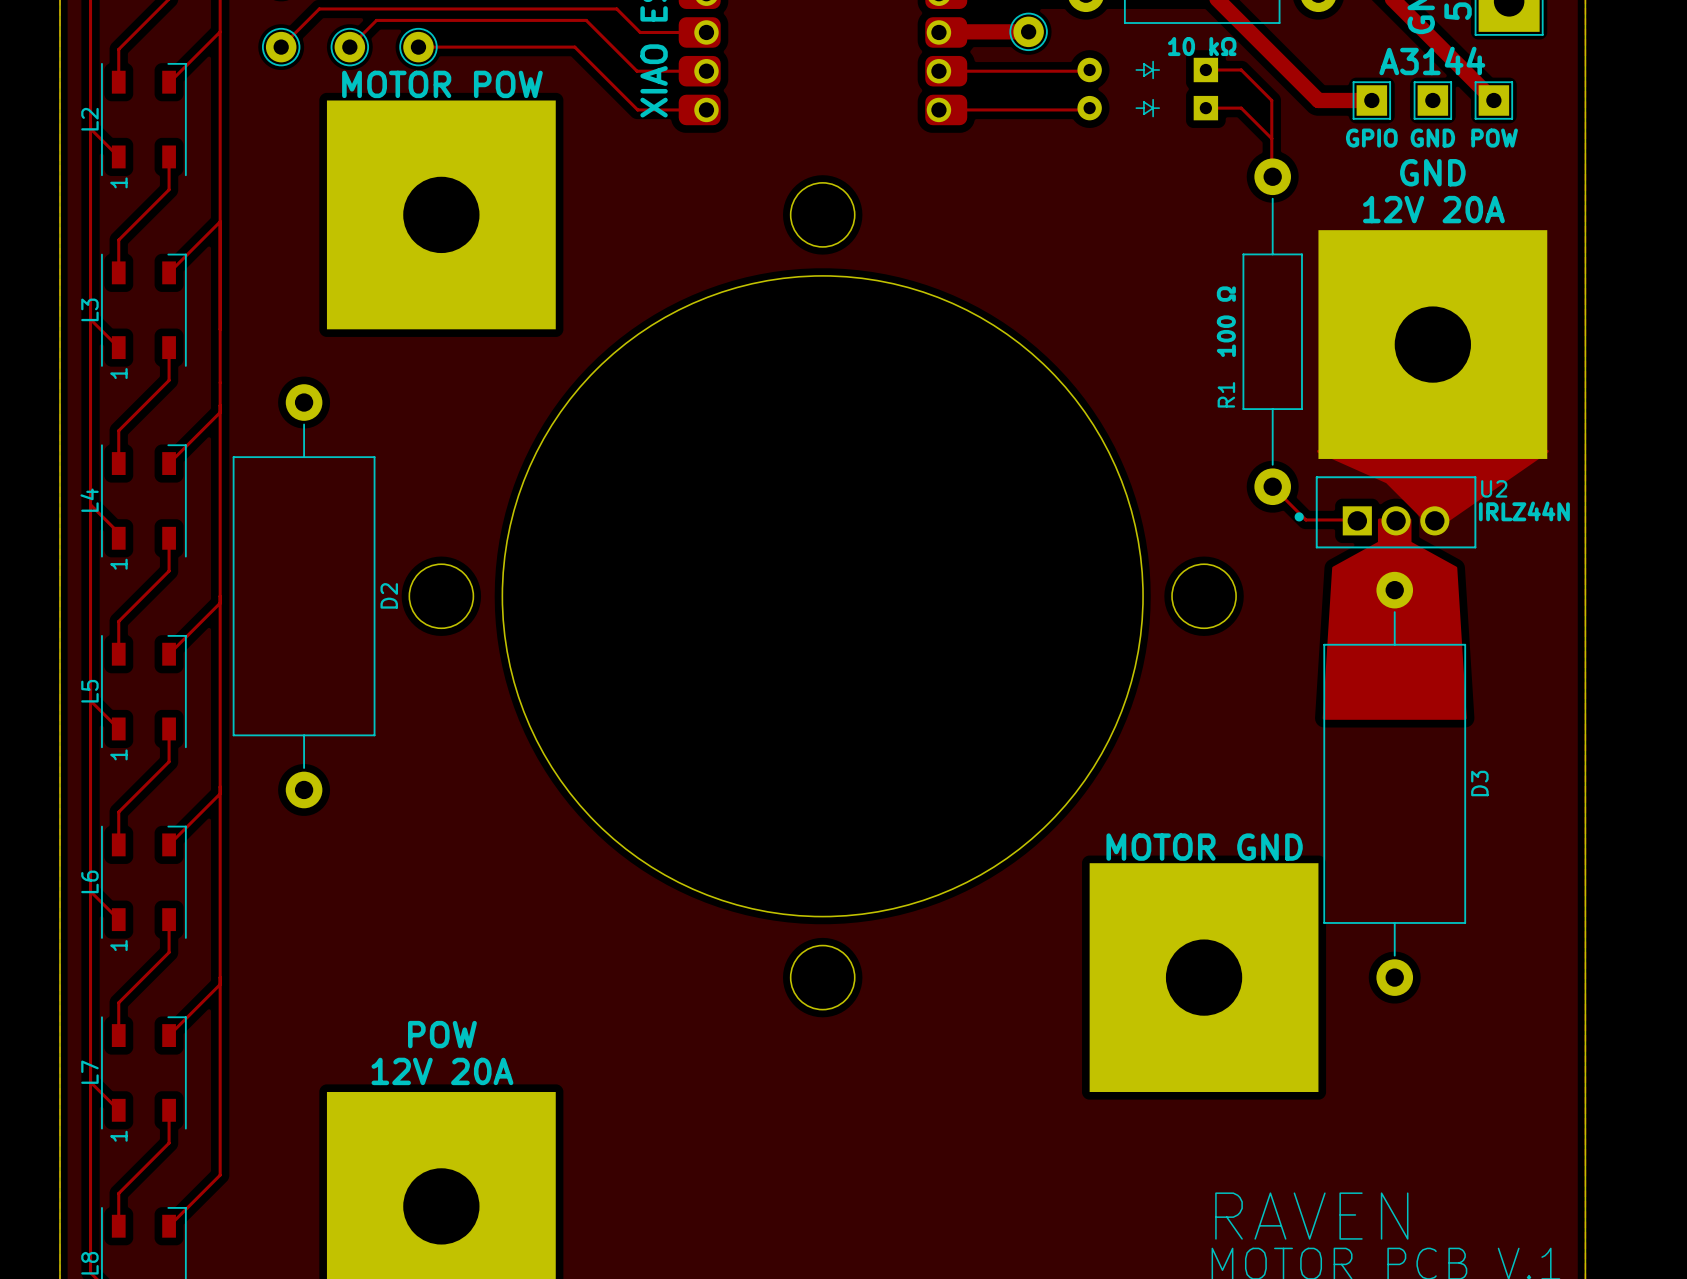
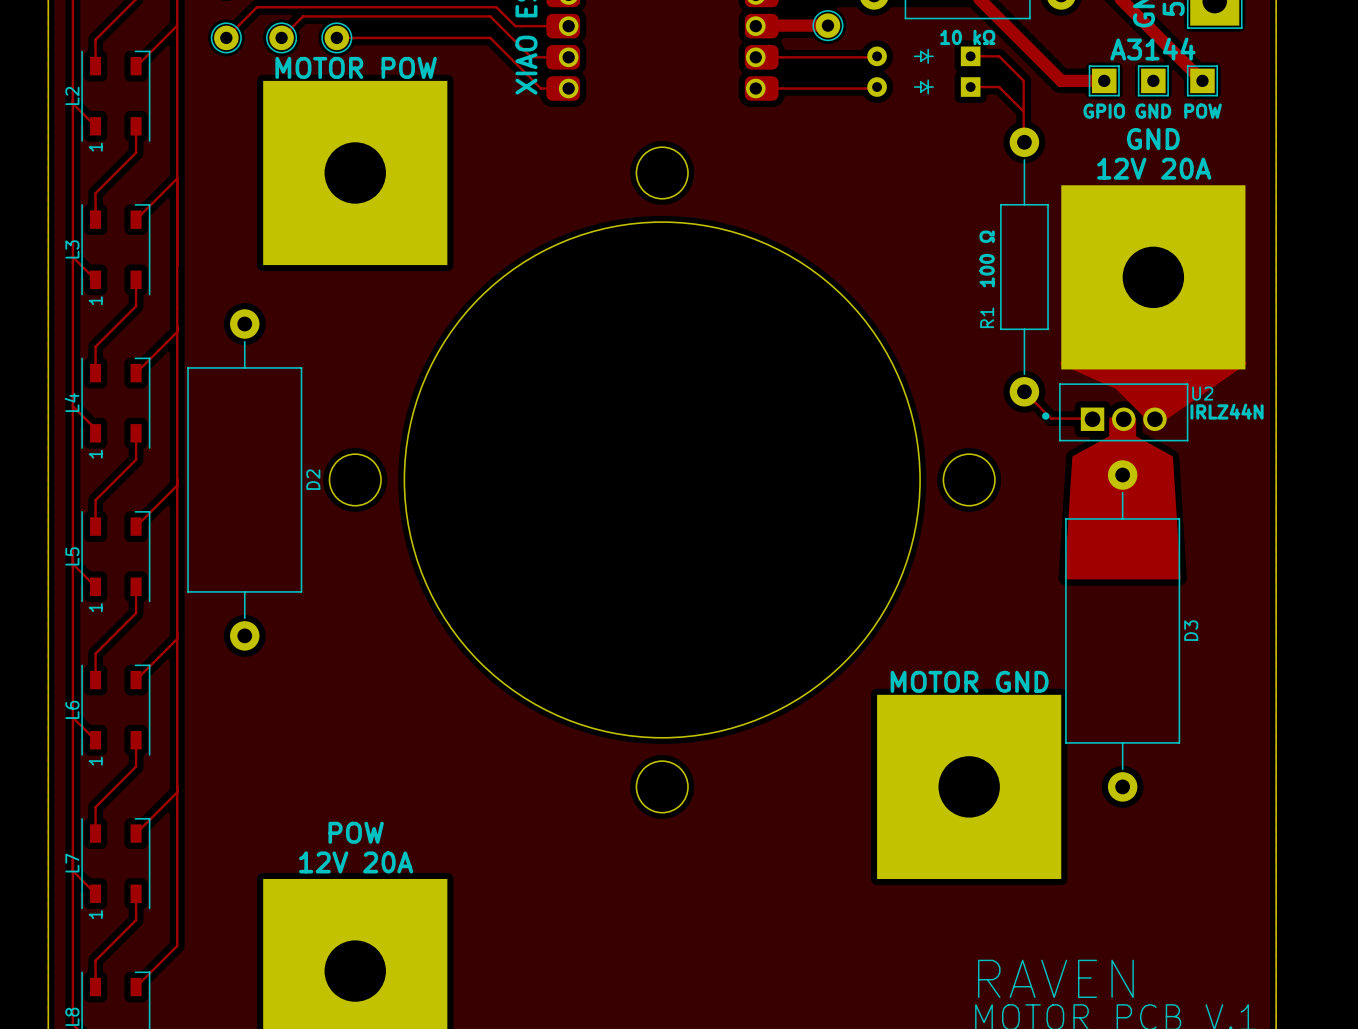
track: (586, 20) (637, 71) (659, 71) -> (471, 16) (490, 16) (531, 57)
track: (574, 47) (637, 109) (672, 109) -> (462, 37) (490, 37) (540, 88)

